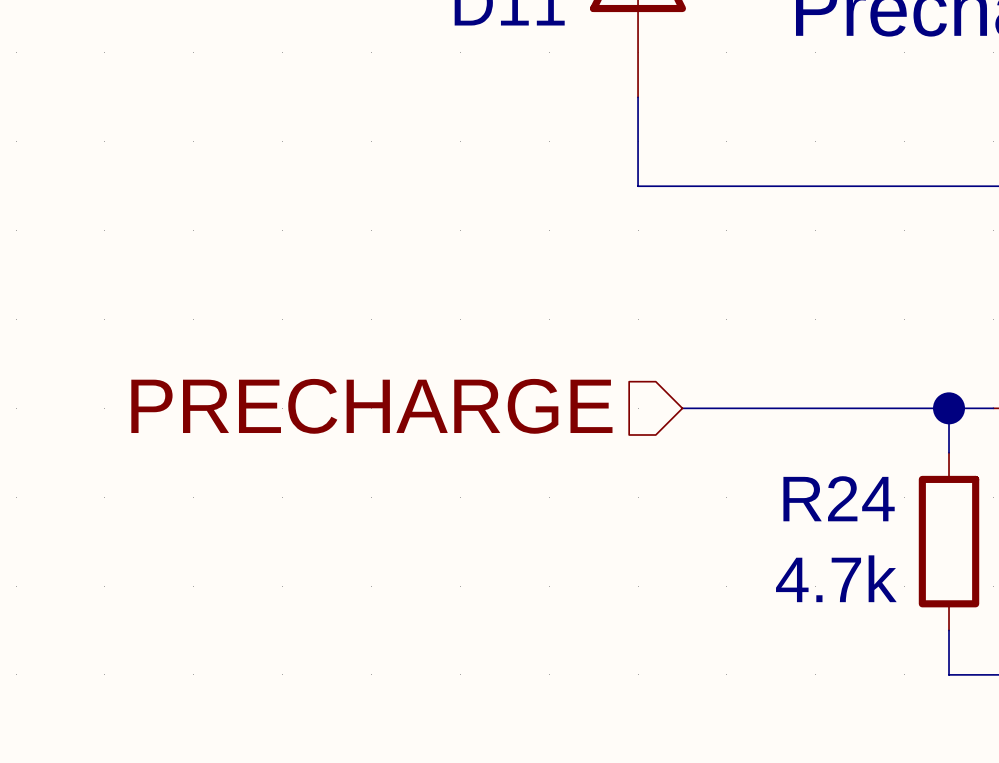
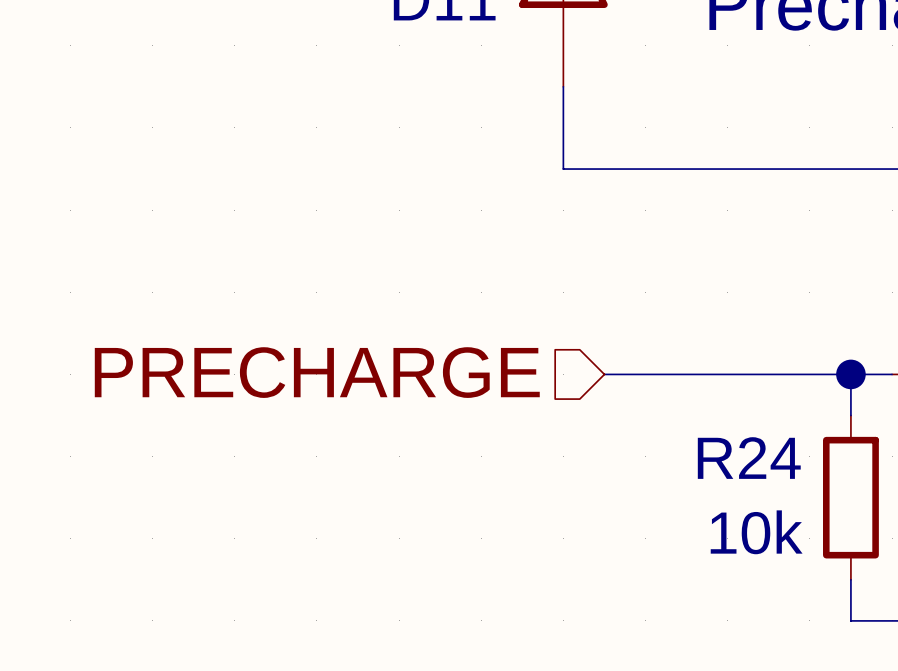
R24 value: 4.7k (836, 578) -> 10k (756, 532)

